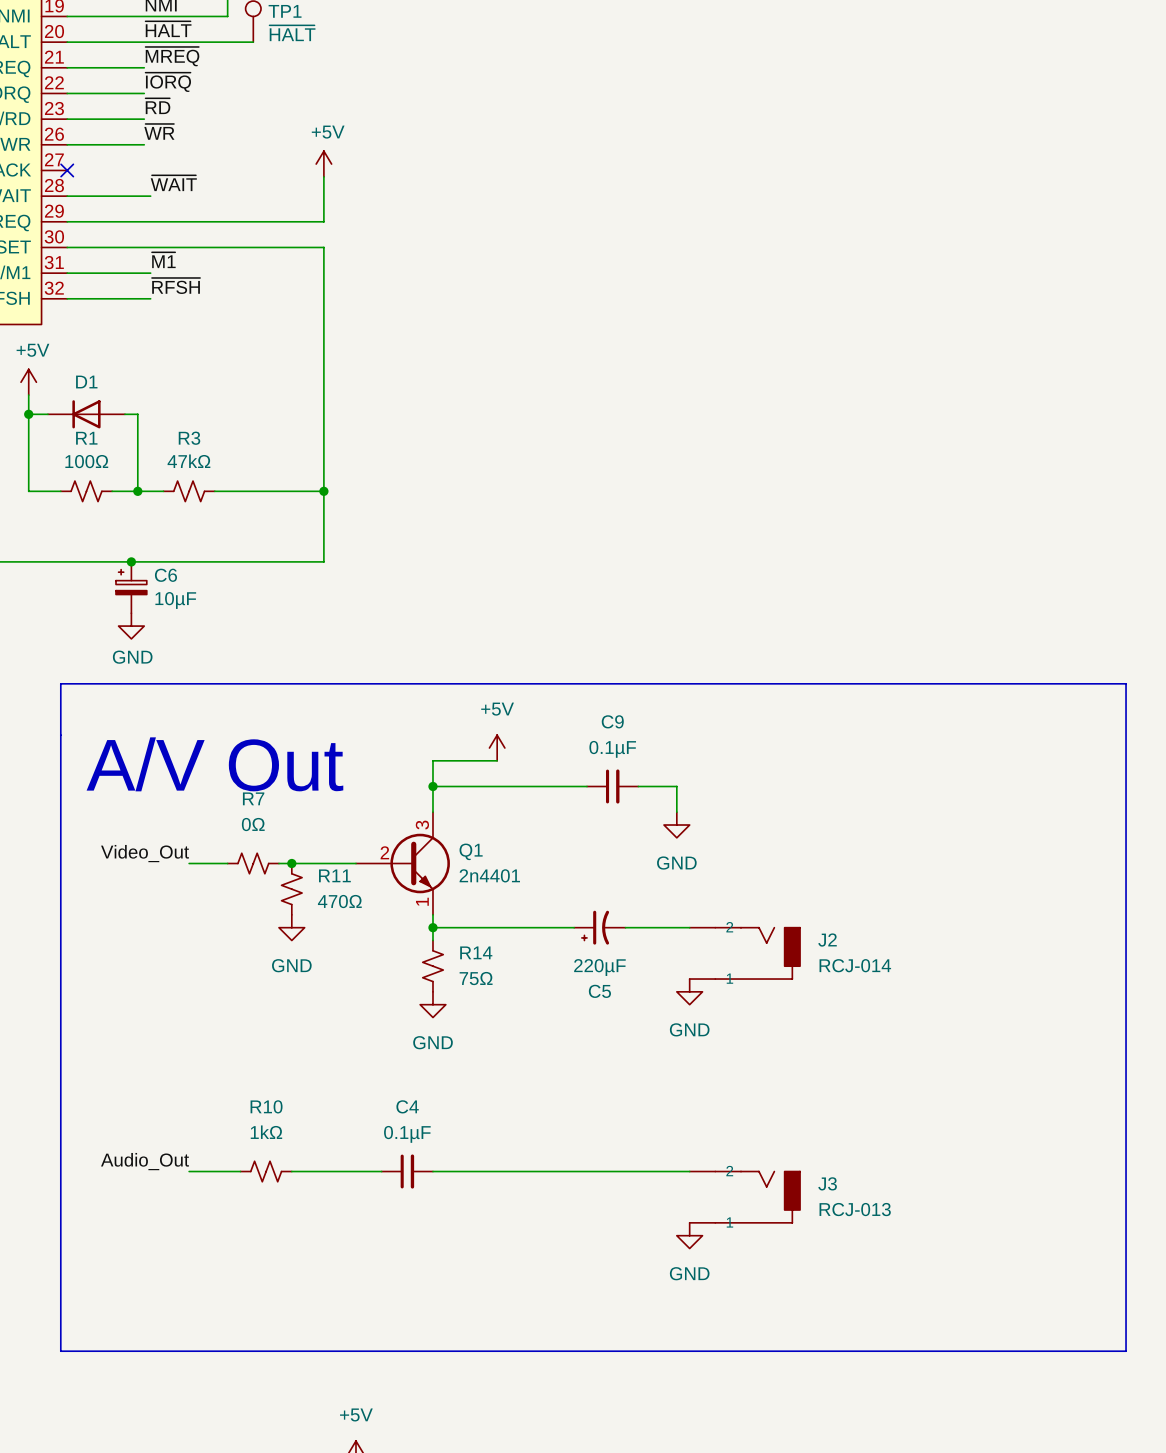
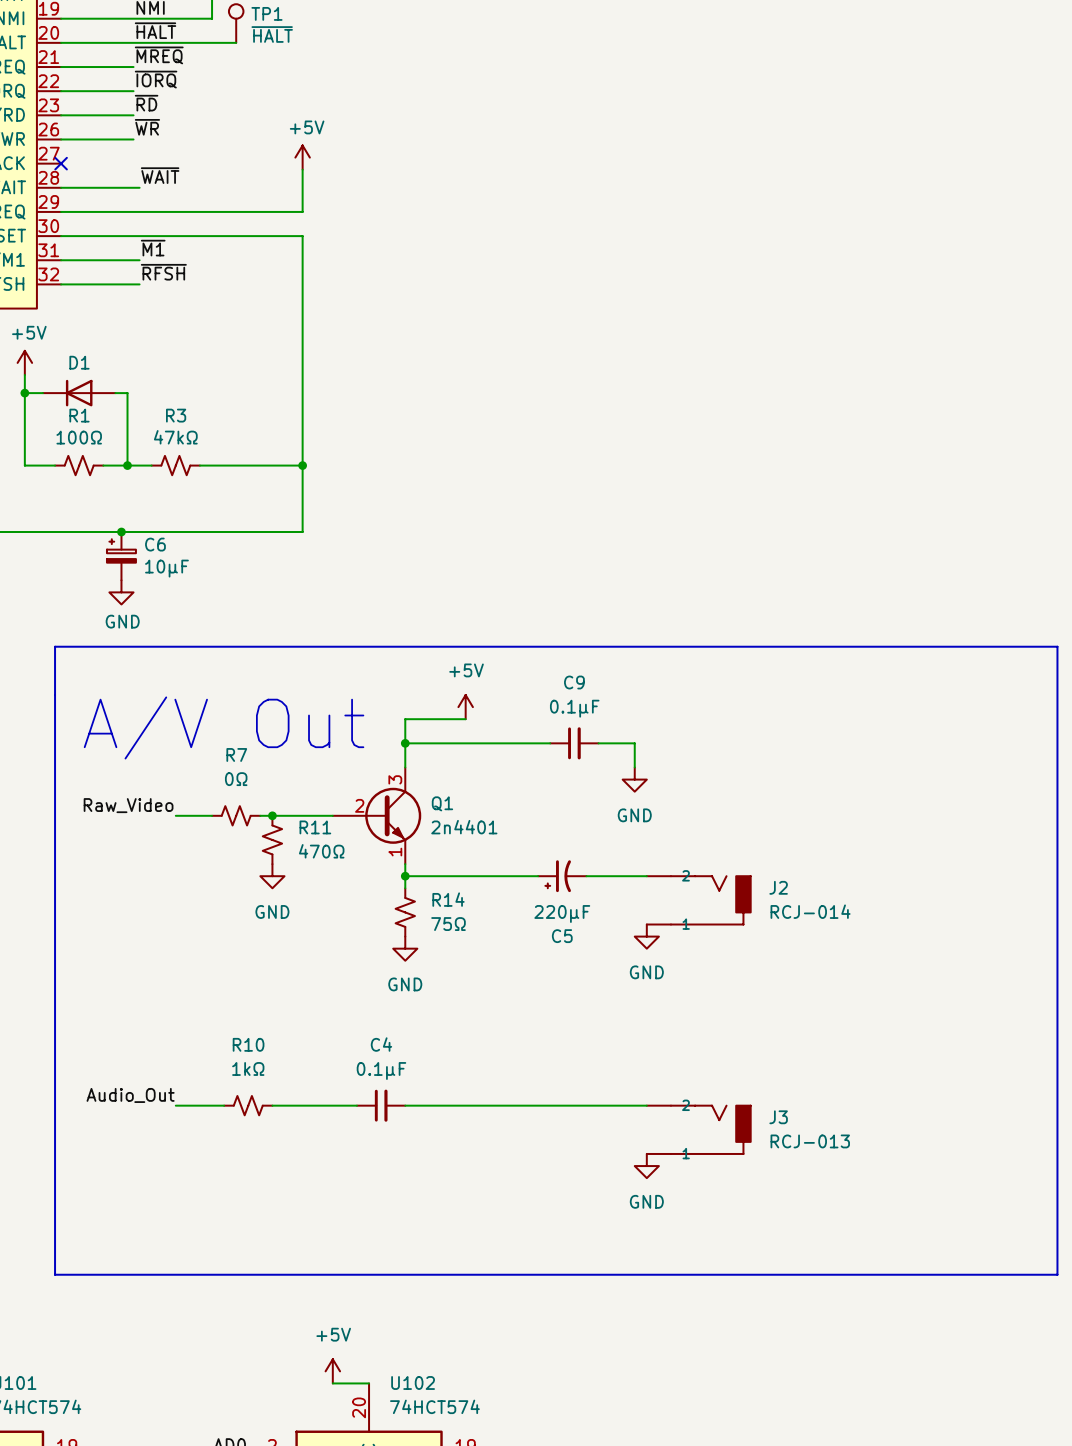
label: Video_Out (145, 853) -> Raw_Video (128, 805)

